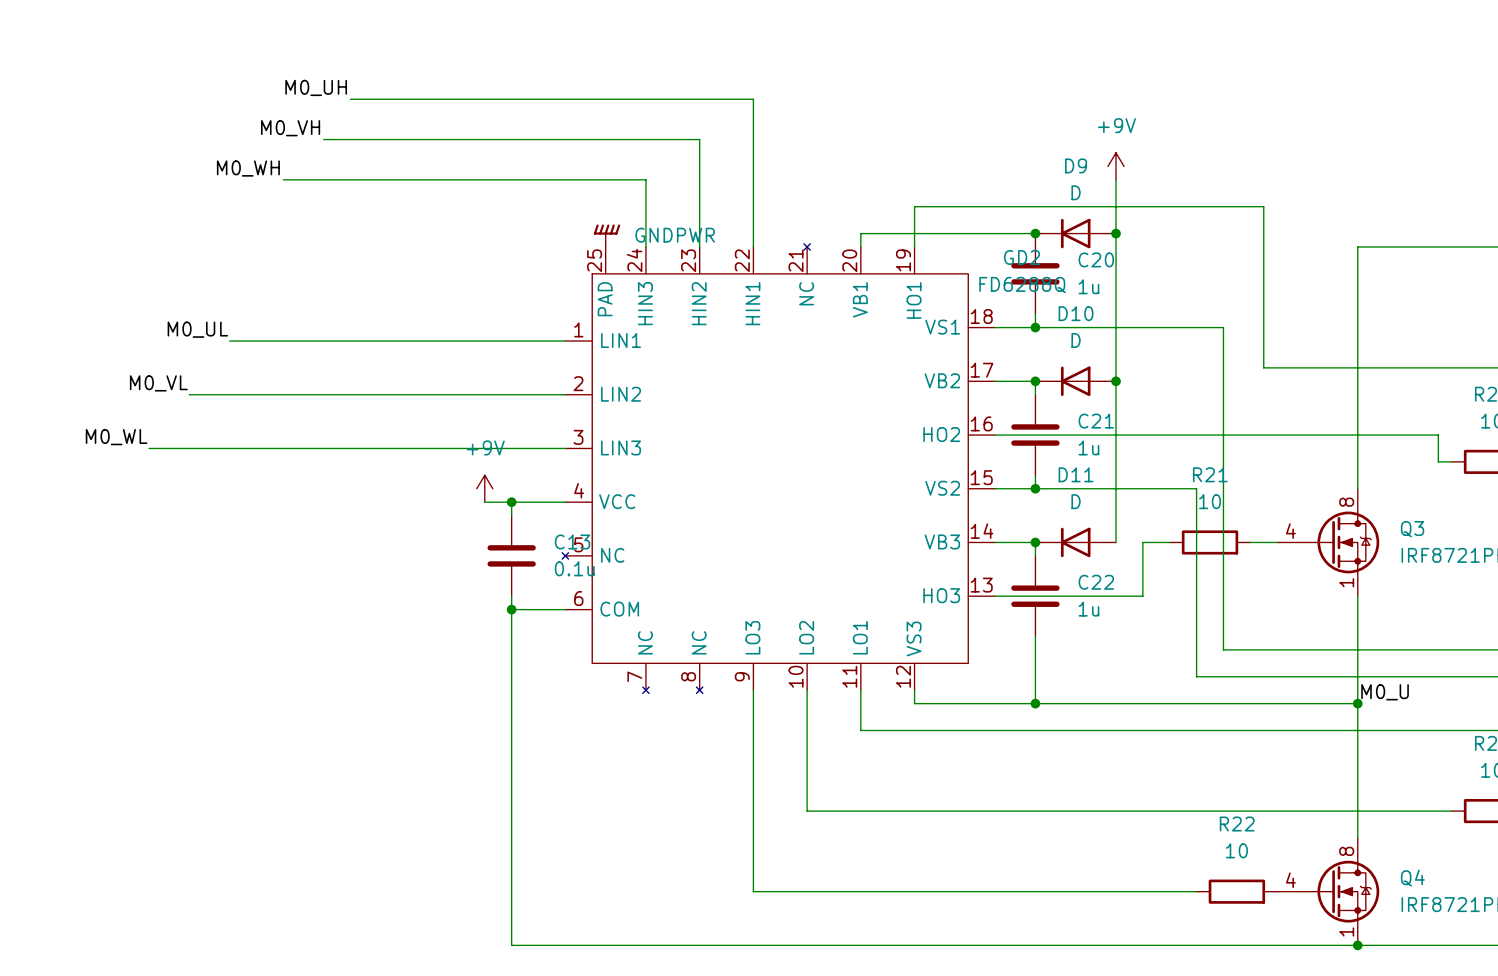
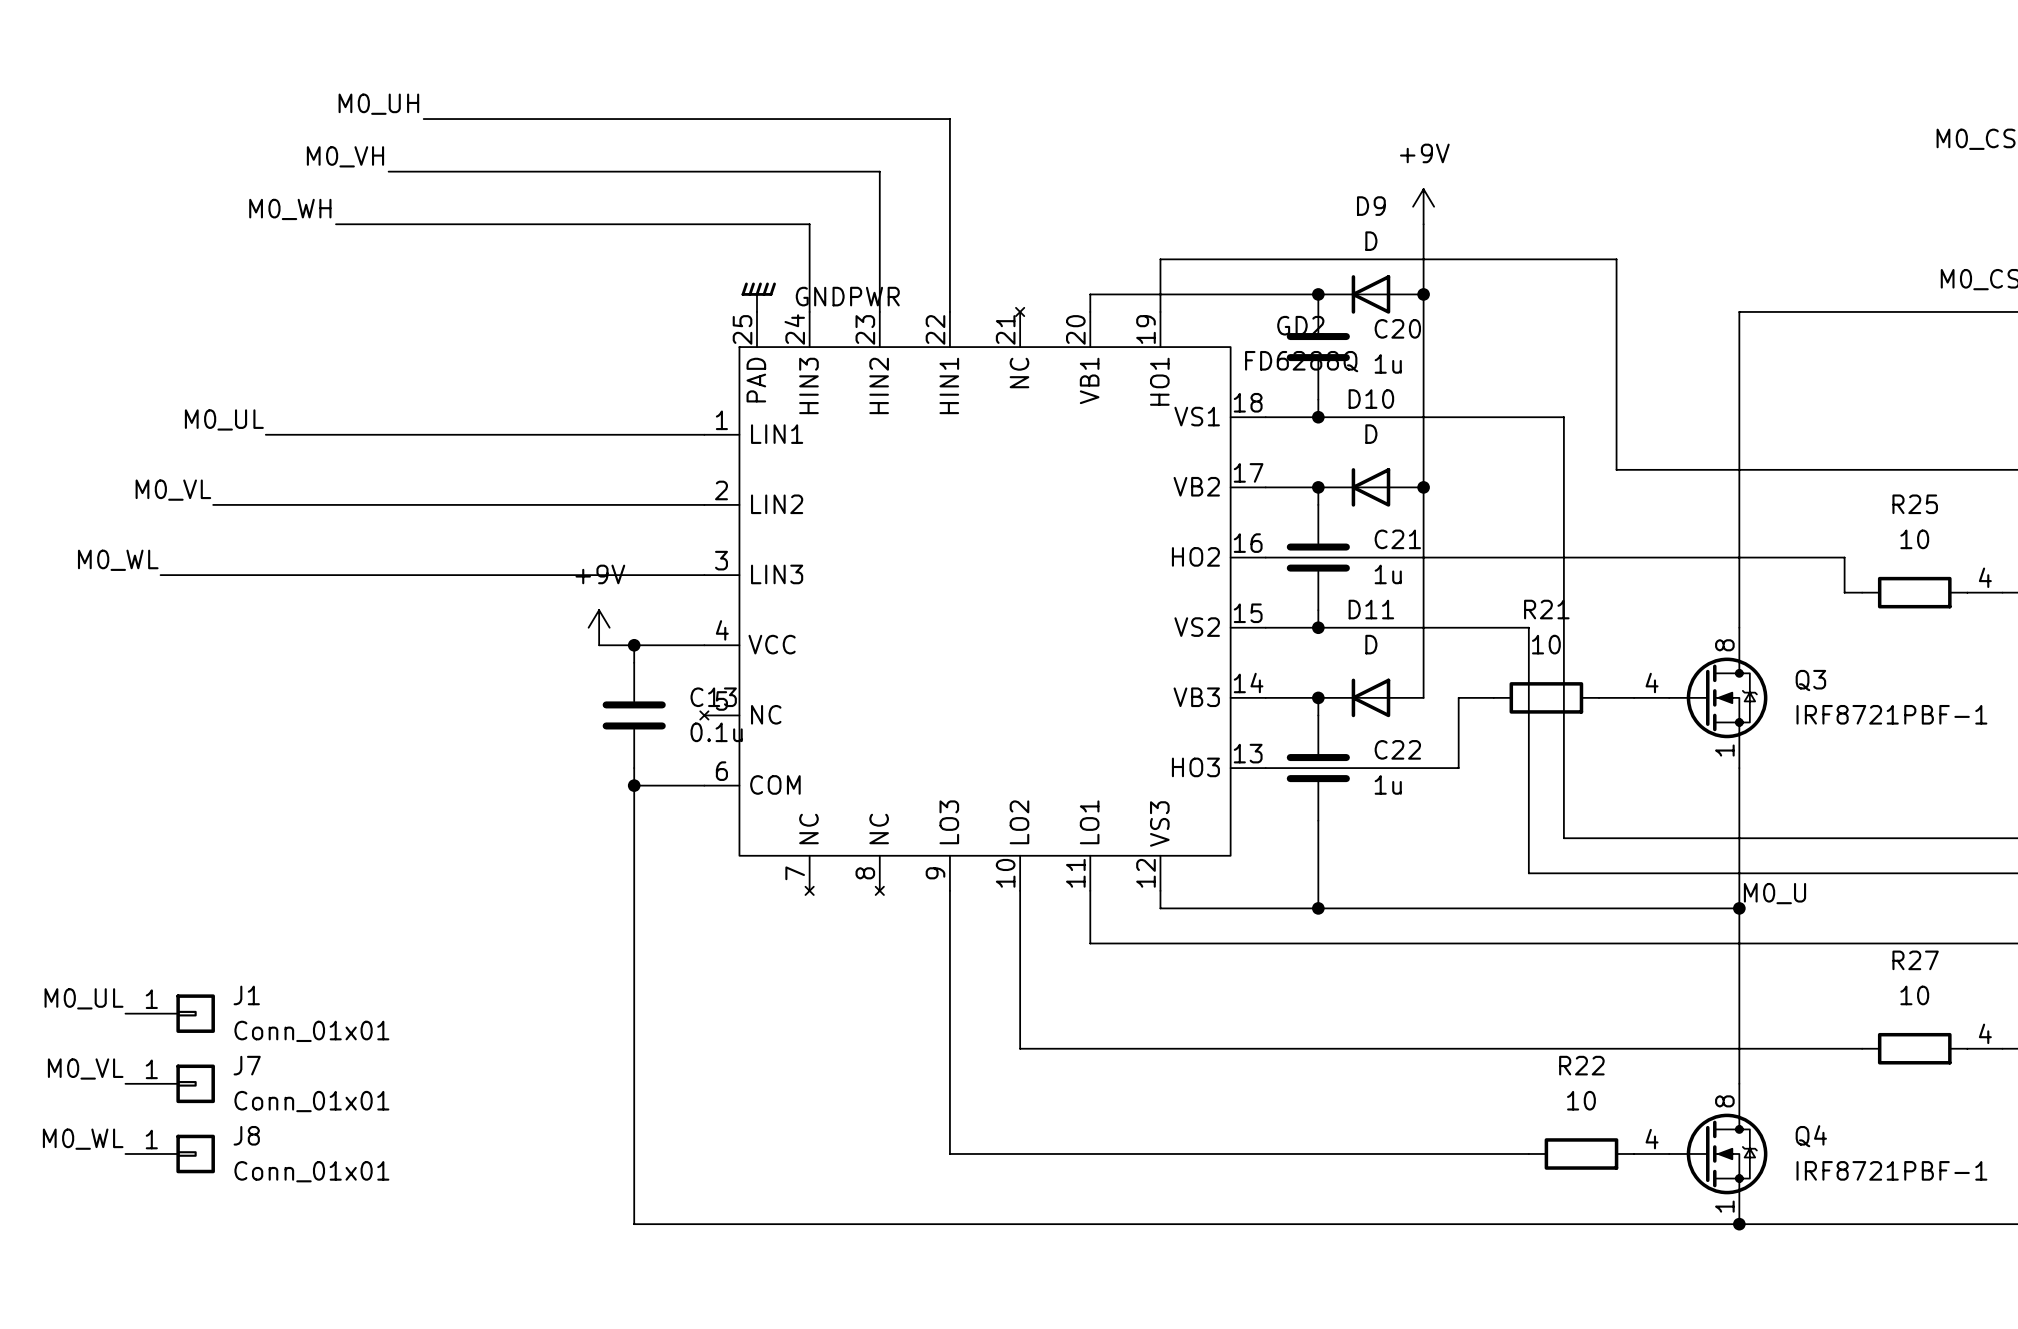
label: none -> M0_UL (84, 998)
J1: none -> Conn_01x01 (170, 1013)
label: none -> M0_VL (85, 1069)
J7: none -> Conn_01x01 (170, 1083)
label: none -> M0_WL (83, 1139)
J8: none -> Conn_01x01 (170, 1153)

